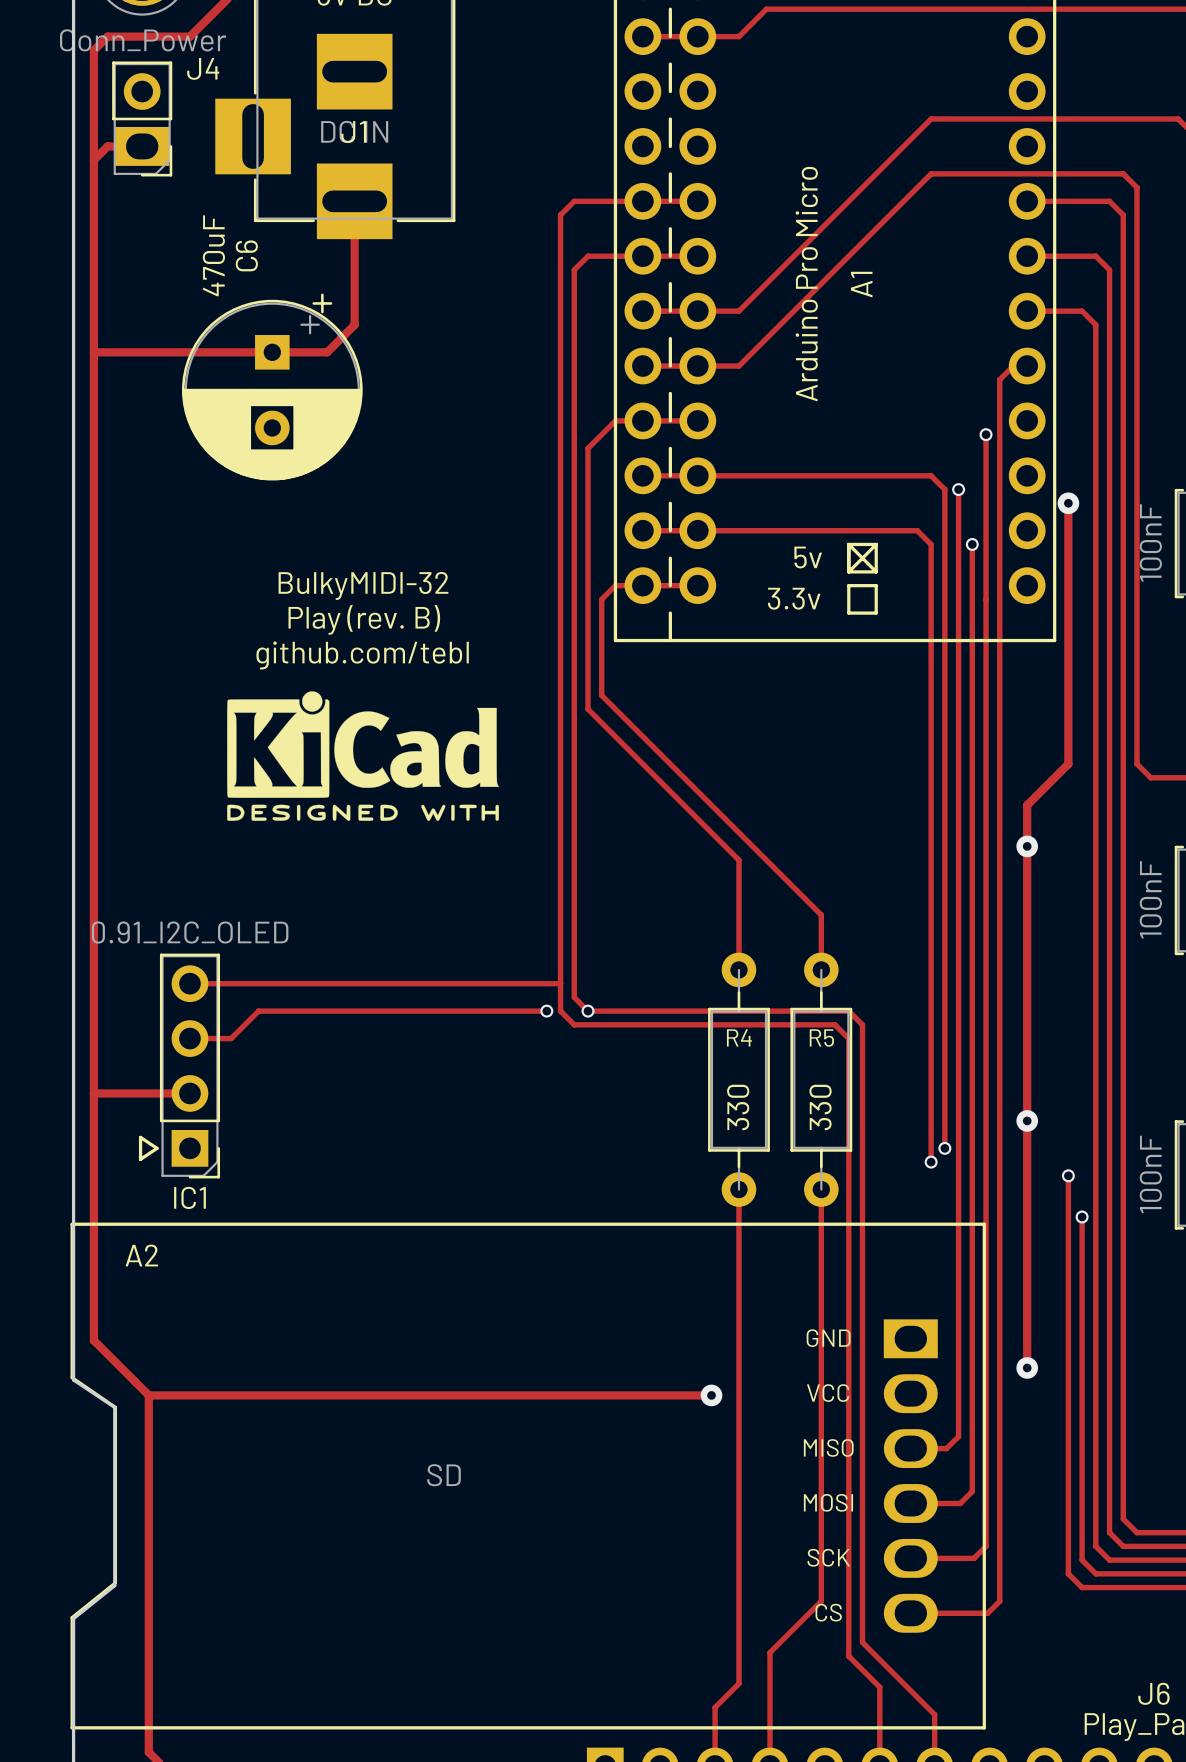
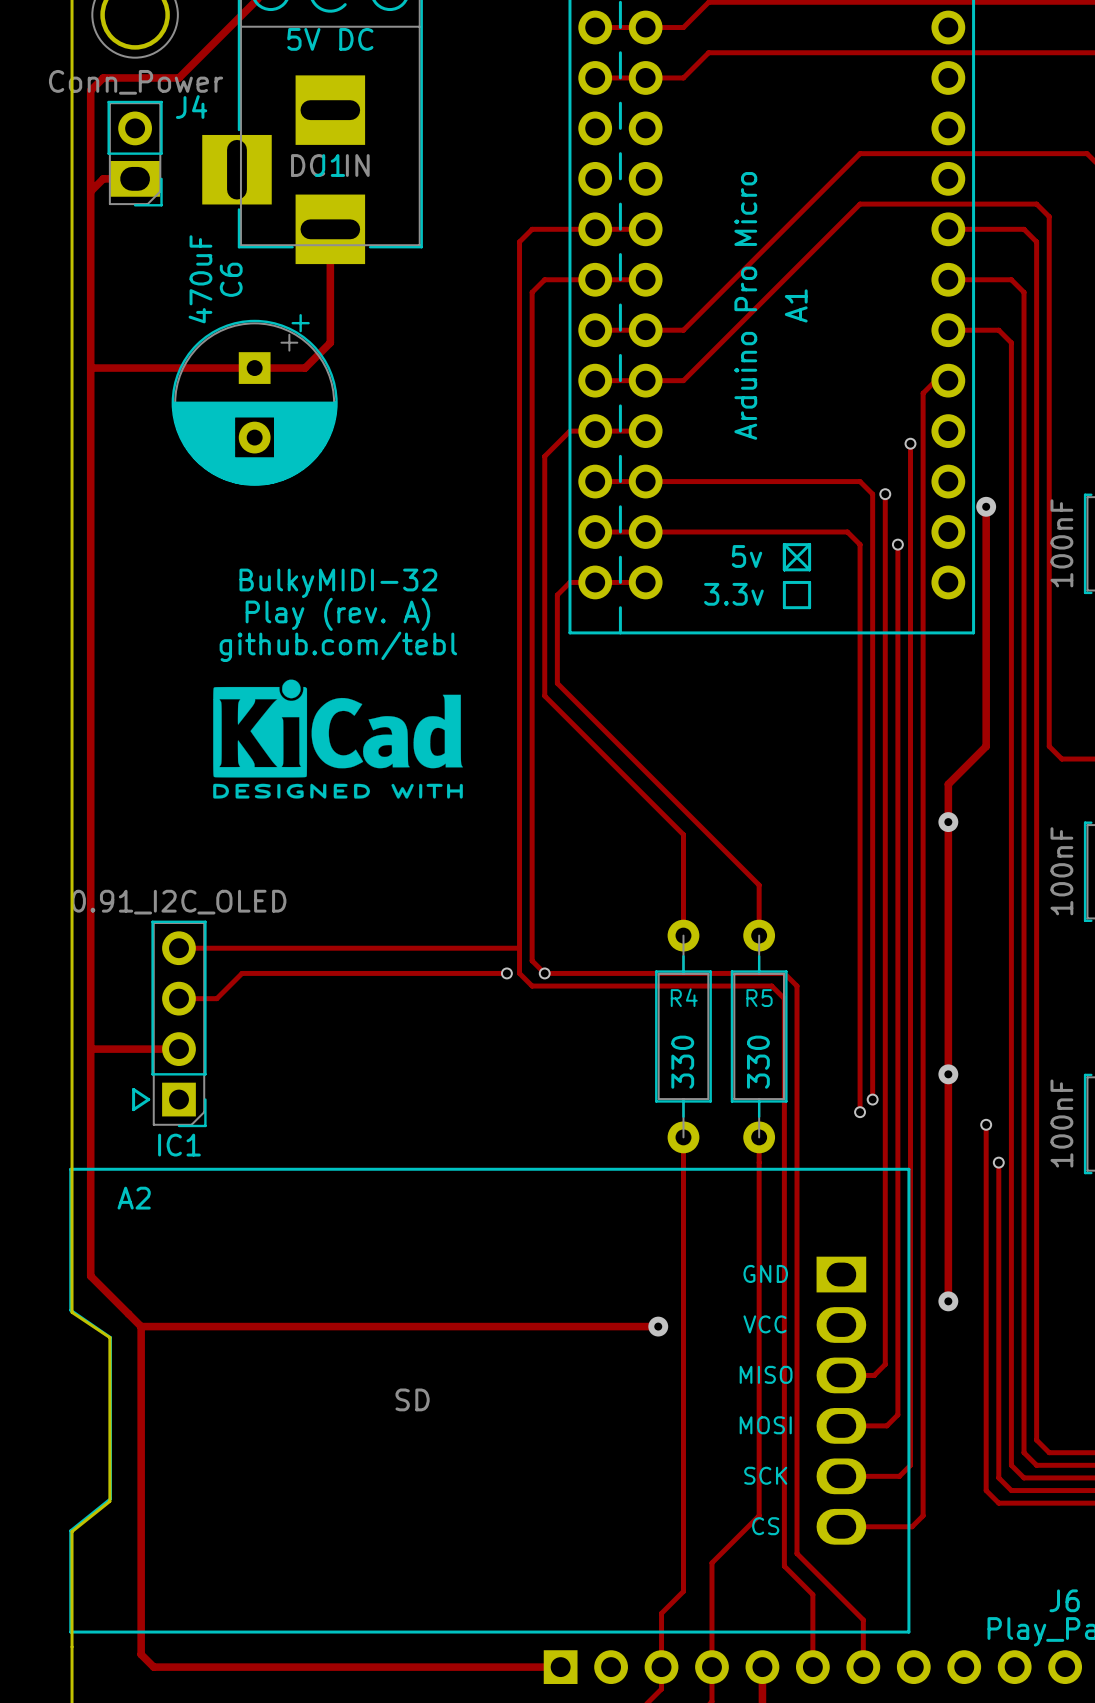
text: Play (rev. B) (364, 619) -> Play (rev. A) (337, 614)

